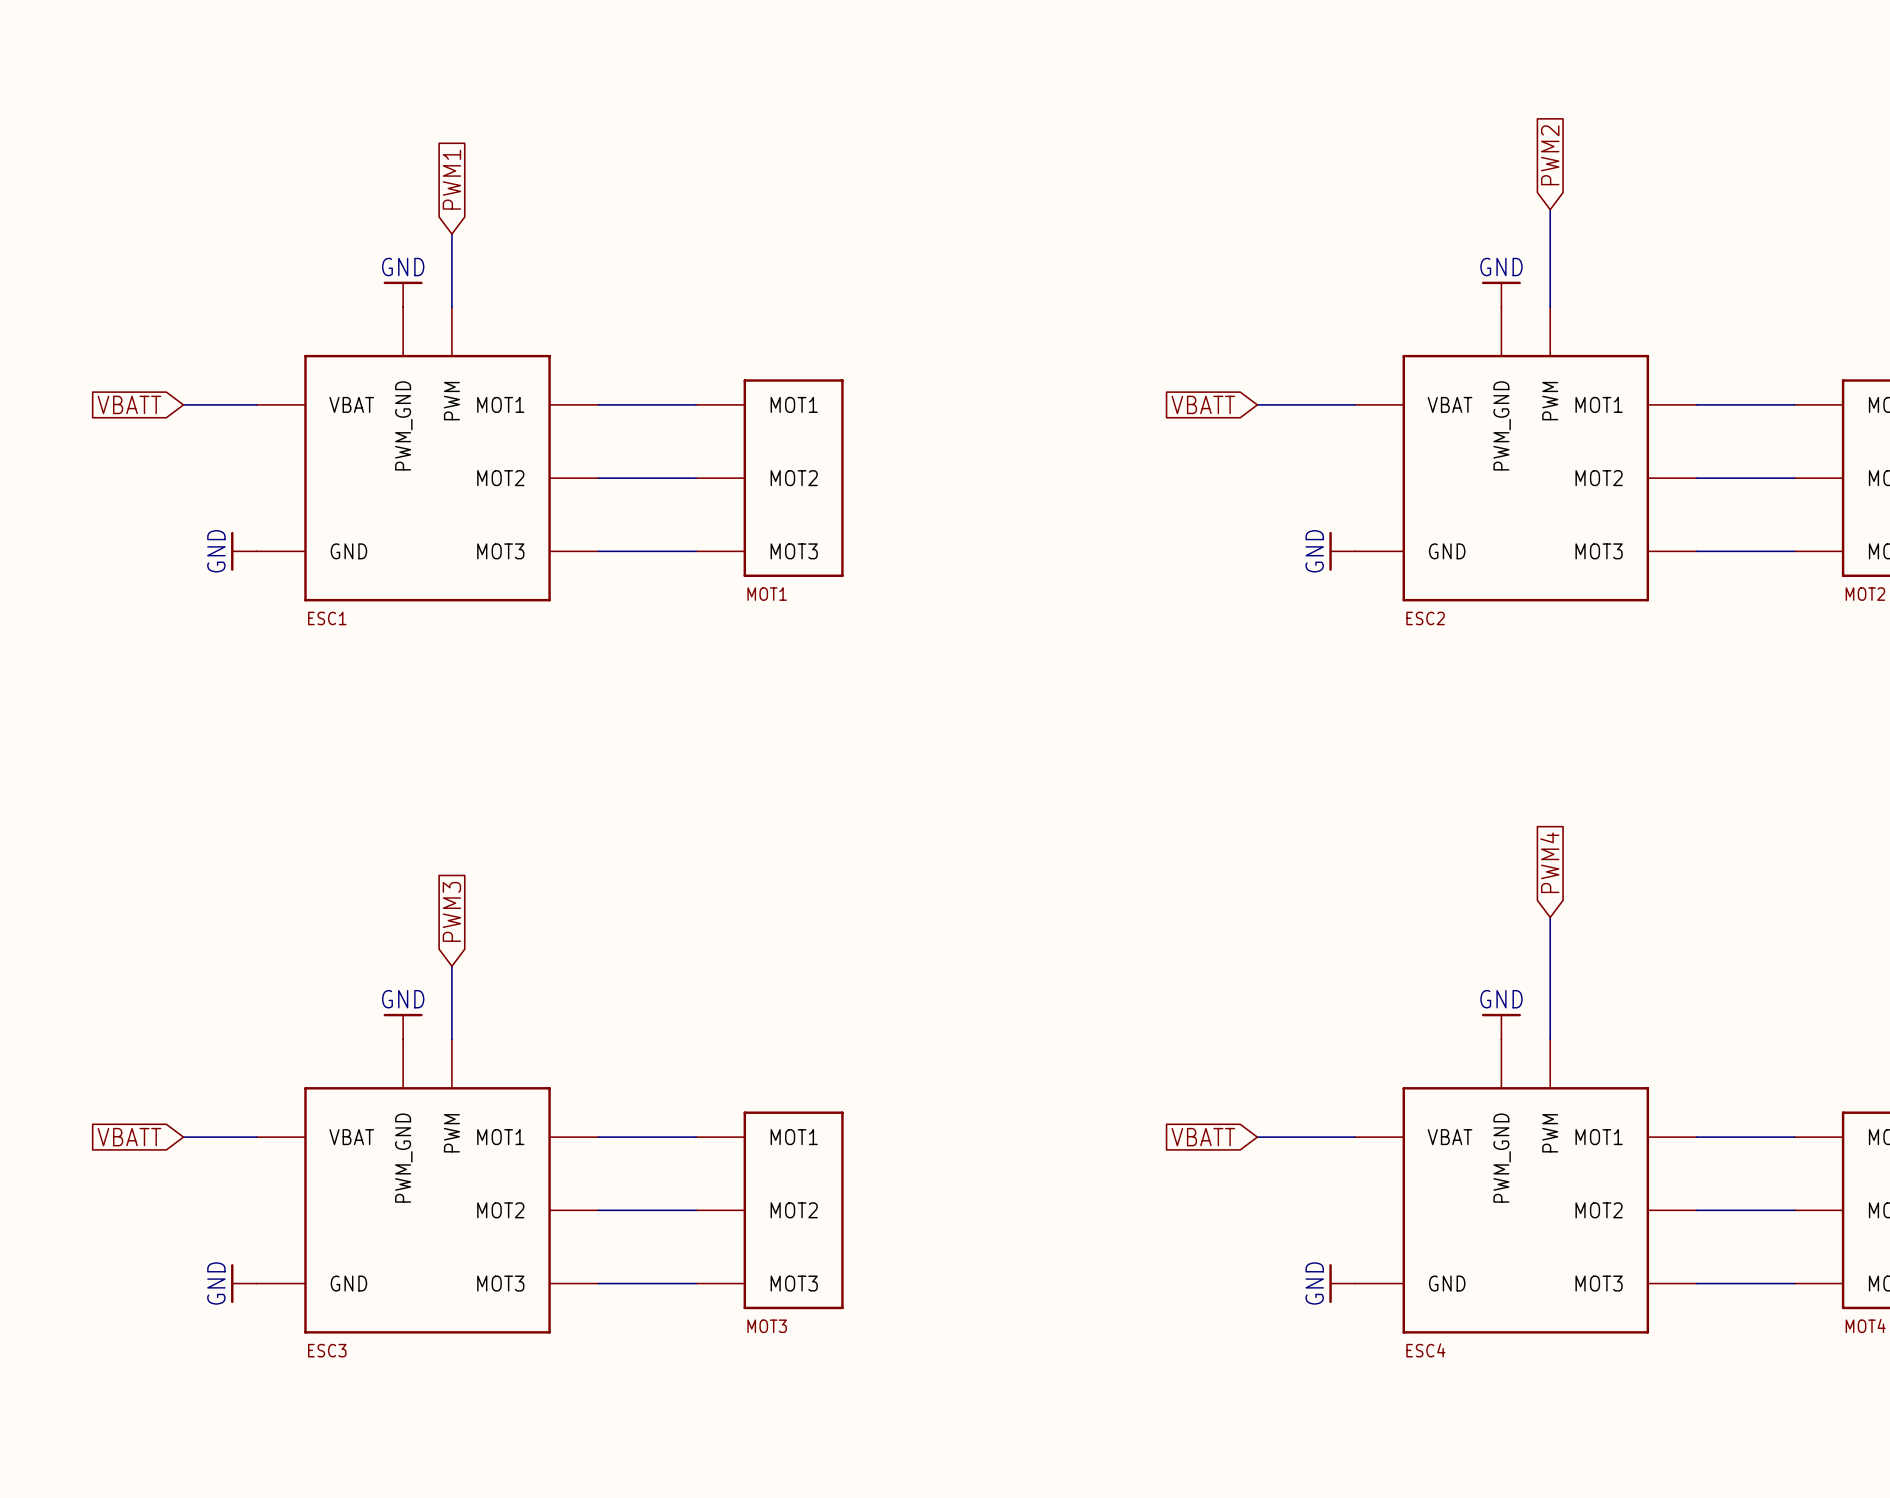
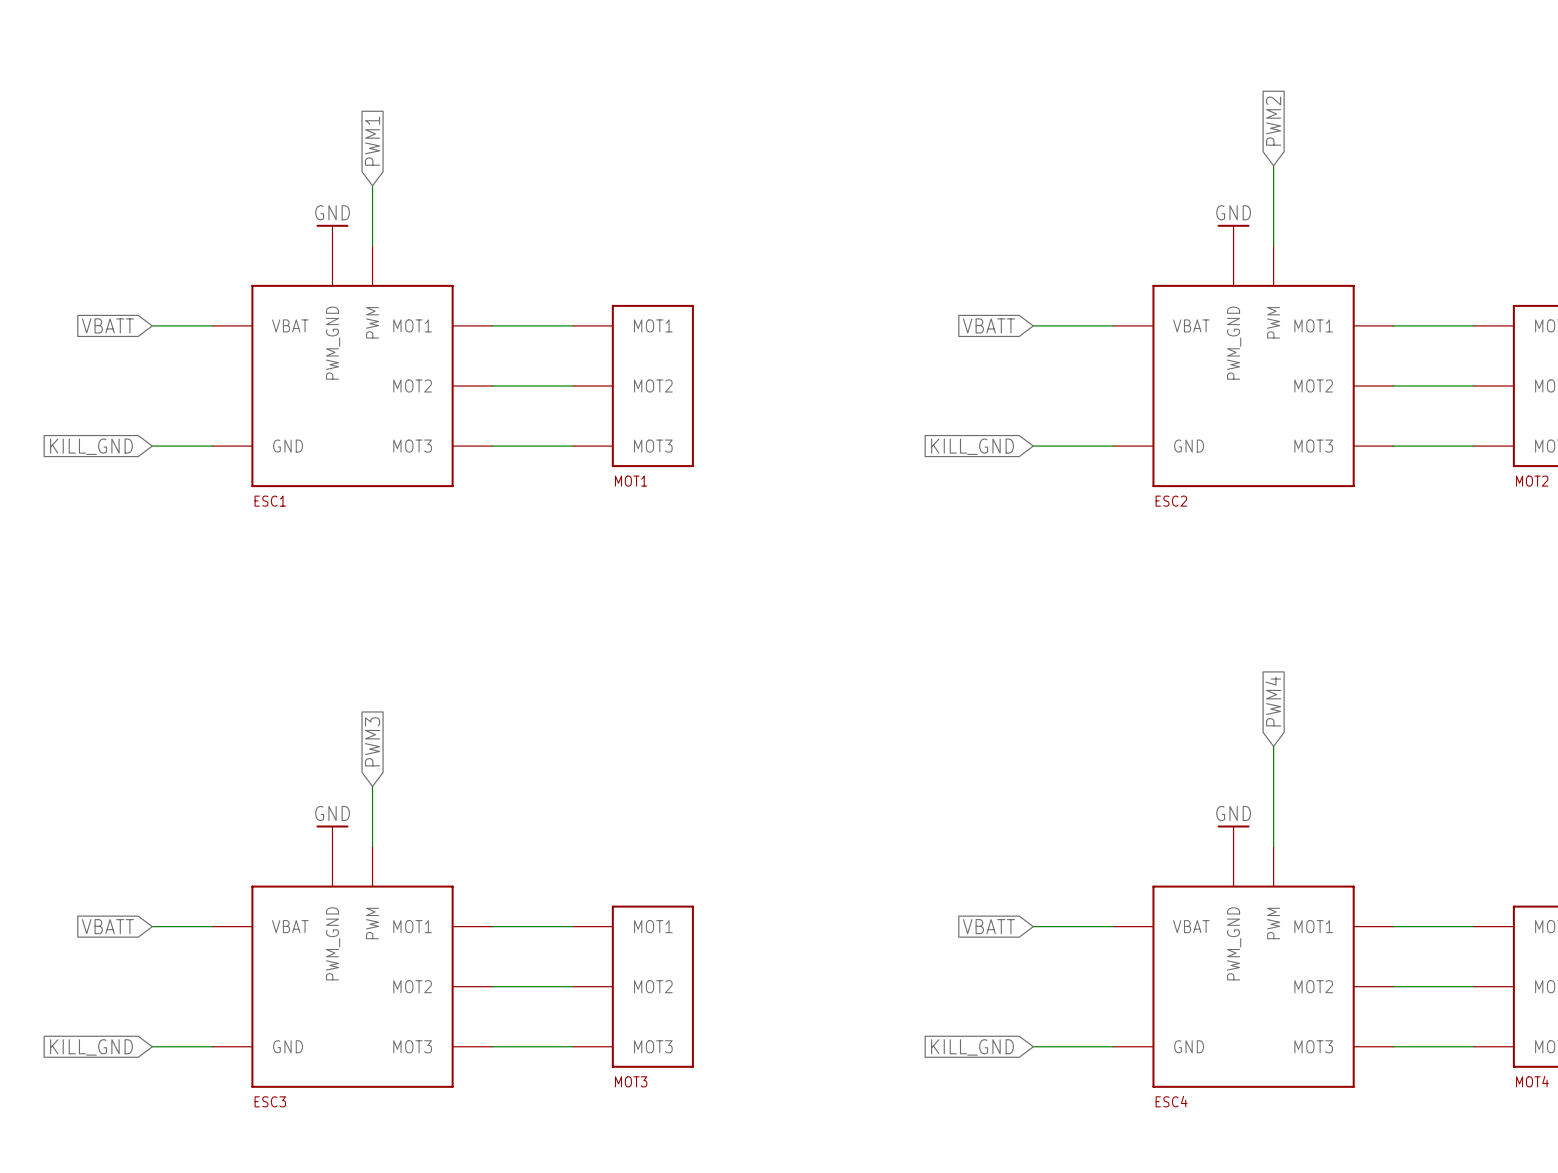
wire: none -> (152, 446) (212, 446)
power symbol: GND (243, 551) -> none
wire: none -> (1033, 446) (1113, 446)
power symbol: GND (1342, 551) -> none
global label: none -> KILL_GND (91, 446)
global label: none -> KILL_GND (972, 446)
wire: none -> (152, 1046) (212, 1046)
power symbol: GND (243, 1283) -> none
wire: none -> (1033, 1046) (1113, 1046)
power symbol: GND (1342, 1283) -> none
global label: none -> KILL_GND (91, 1047)
global label: none -> KILL_GND (972, 1047)

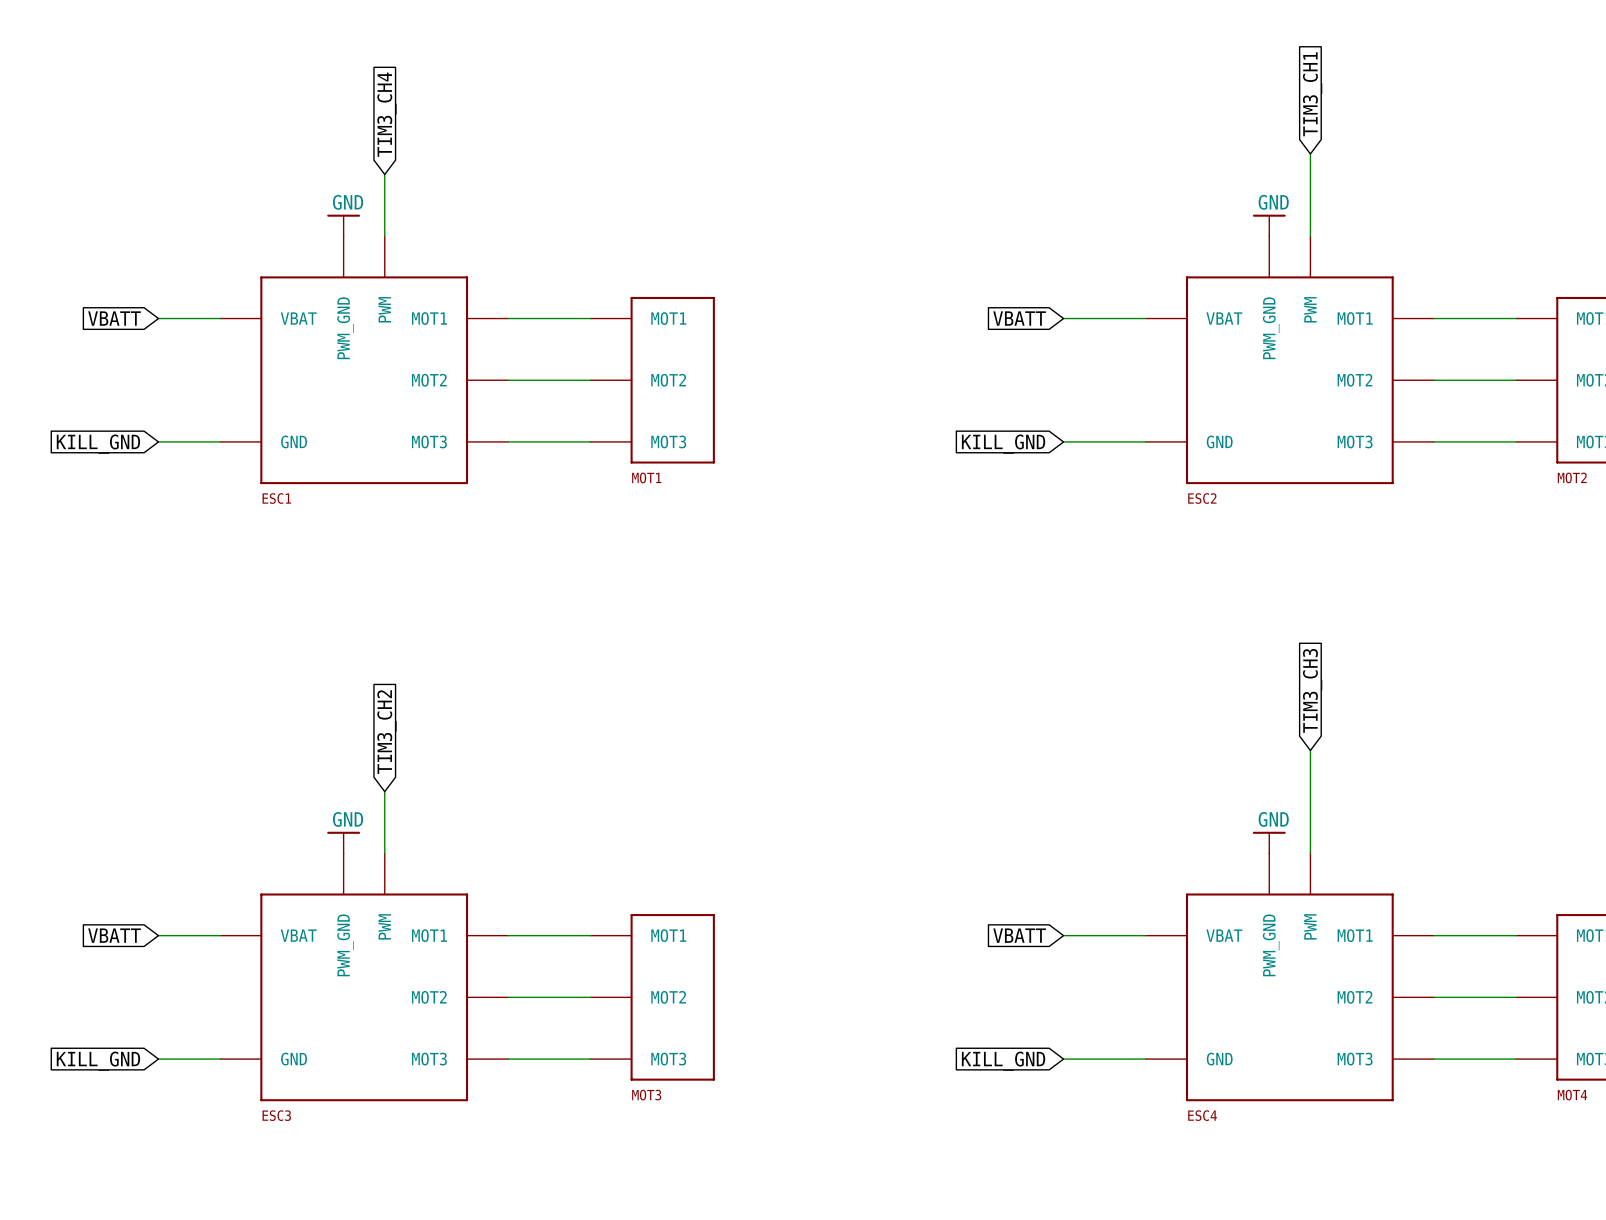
global label: PWM2 (1273, 121) -> TIM3_CH1 (1312, 94)
global label: PWM1 (372, 141) -> TIM3_CH4 (386, 114)
global label: PWM4 (1273, 701) -> TIM3_CH3 (1312, 690)
global label: PWM3 (372, 741) -> TIM3_CH2 (386, 732)

